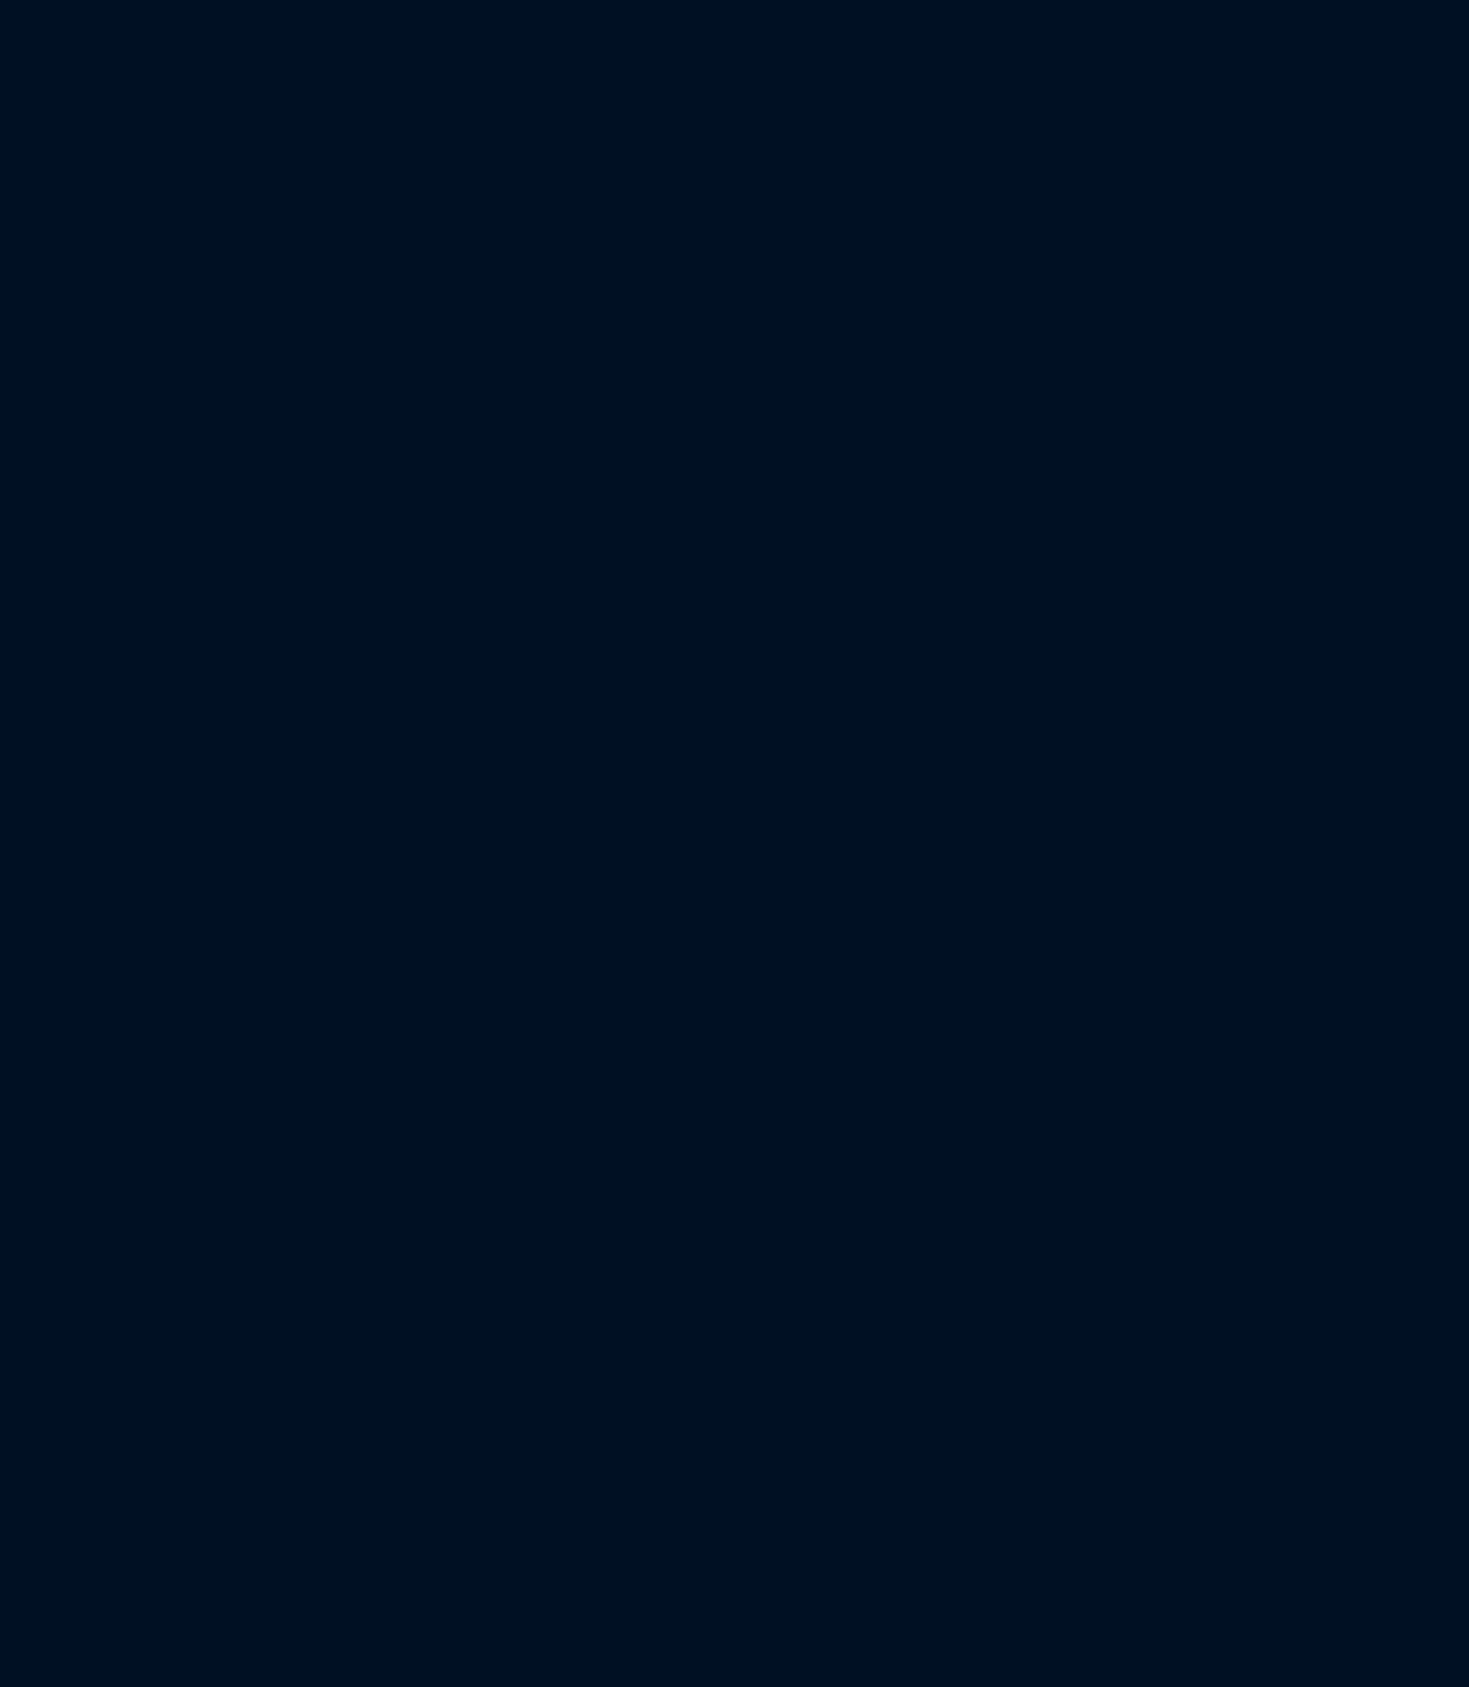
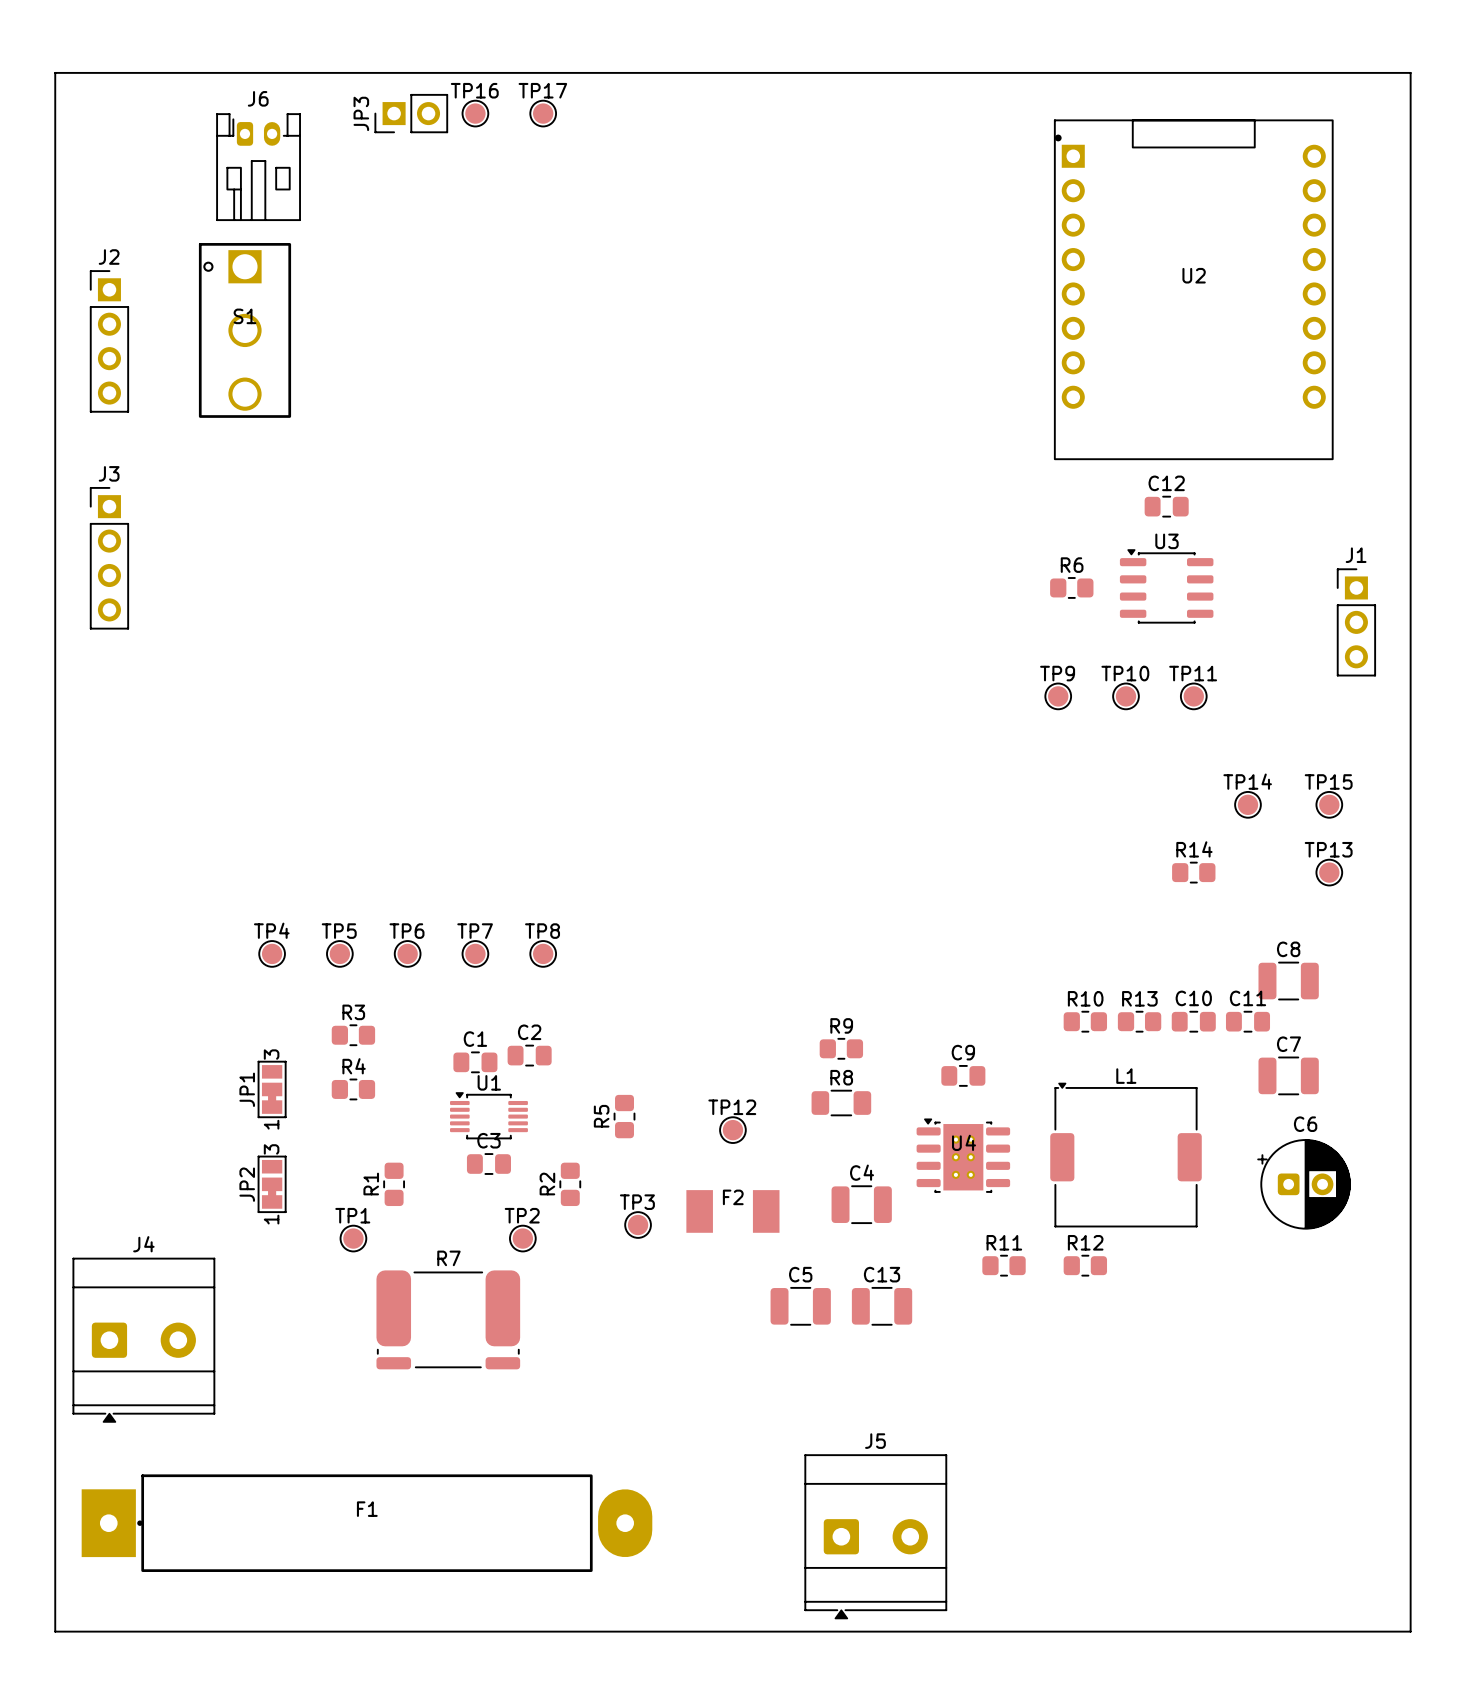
board edge: none -> (55, 72) (1410, 72) (1410, 1631) (55, 1631) (55, 72)
JP3: none -> (411, 113)
TP16: none -> (475, 113)
TP17: none -> (543, 113)
J6: none -> (258, 167)
U2: none -> (1193, 289)
S1: none -> (244, 330)
J2: none -> (109, 341)
C12: none -> (1166, 506)
J3: none -> (109, 558)
U3: none -> (1166, 586)
R6: none -> (1071, 587)
J1: none -> (1356, 622)
TP9: none -> (1058, 696)
TP10: none -> (1126, 696)
TP11: none -> (1193, 696)
TP14: none -> (1247, 804)
TP15: none -> (1329, 804)
R14: none -> (1193, 872)
TP13: none -> (1329, 872)
TP4: none -> (272, 953)
TP5: none -> (339, 953)
TP6: none -> (407, 953)
TP7: none -> (475, 953)
TP8: none -> (543, 953)
C8: none -> (1288, 981)
R10: none -> (1085, 1021)
R13: none -> (1139, 1021)
C10: none -> (1193, 1021)
C11: none -> (1247, 1021)
R3: none -> (353, 1035)
R9: none -> (841, 1048)
C2: none -> (529, 1055)
C1: none -> (475, 1062)
C9: none -> (963, 1075)
C7: none -> (1288, 1075)
JP1: none -> (272, 1089)
R4: none -> (353, 1089)
R8: none -> (841, 1103)
U1: none -> (488, 1115)
R5: none -> (624, 1116)
TP12: none -> (732, 1130)
L1: none -> (1126, 1154)
U4: none -> (963, 1155)
C3: none -> (488, 1164)
JP2: none -> (272, 1184)
R1: none -> (394, 1184)
R2: none -> (570, 1184)
C6: none -> (1304, 1184)
C4: none -> (861, 1204)
F2: none -> (732, 1211)
TP3: none -> (638, 1225)
TP1: none -> (353, 1238)
TP2: none -> (522, 1238)
R11: none -> (1004, 1265)
R12: none -> (1085, 1265)
C5: none -> (800, 1306)
C13: none -> (882, 1306)
R7: none -> (448, 1319)
J4: none -> (143, 1340)
F1: none -> (366, 1523)
J5: none -> (875, 1536)

